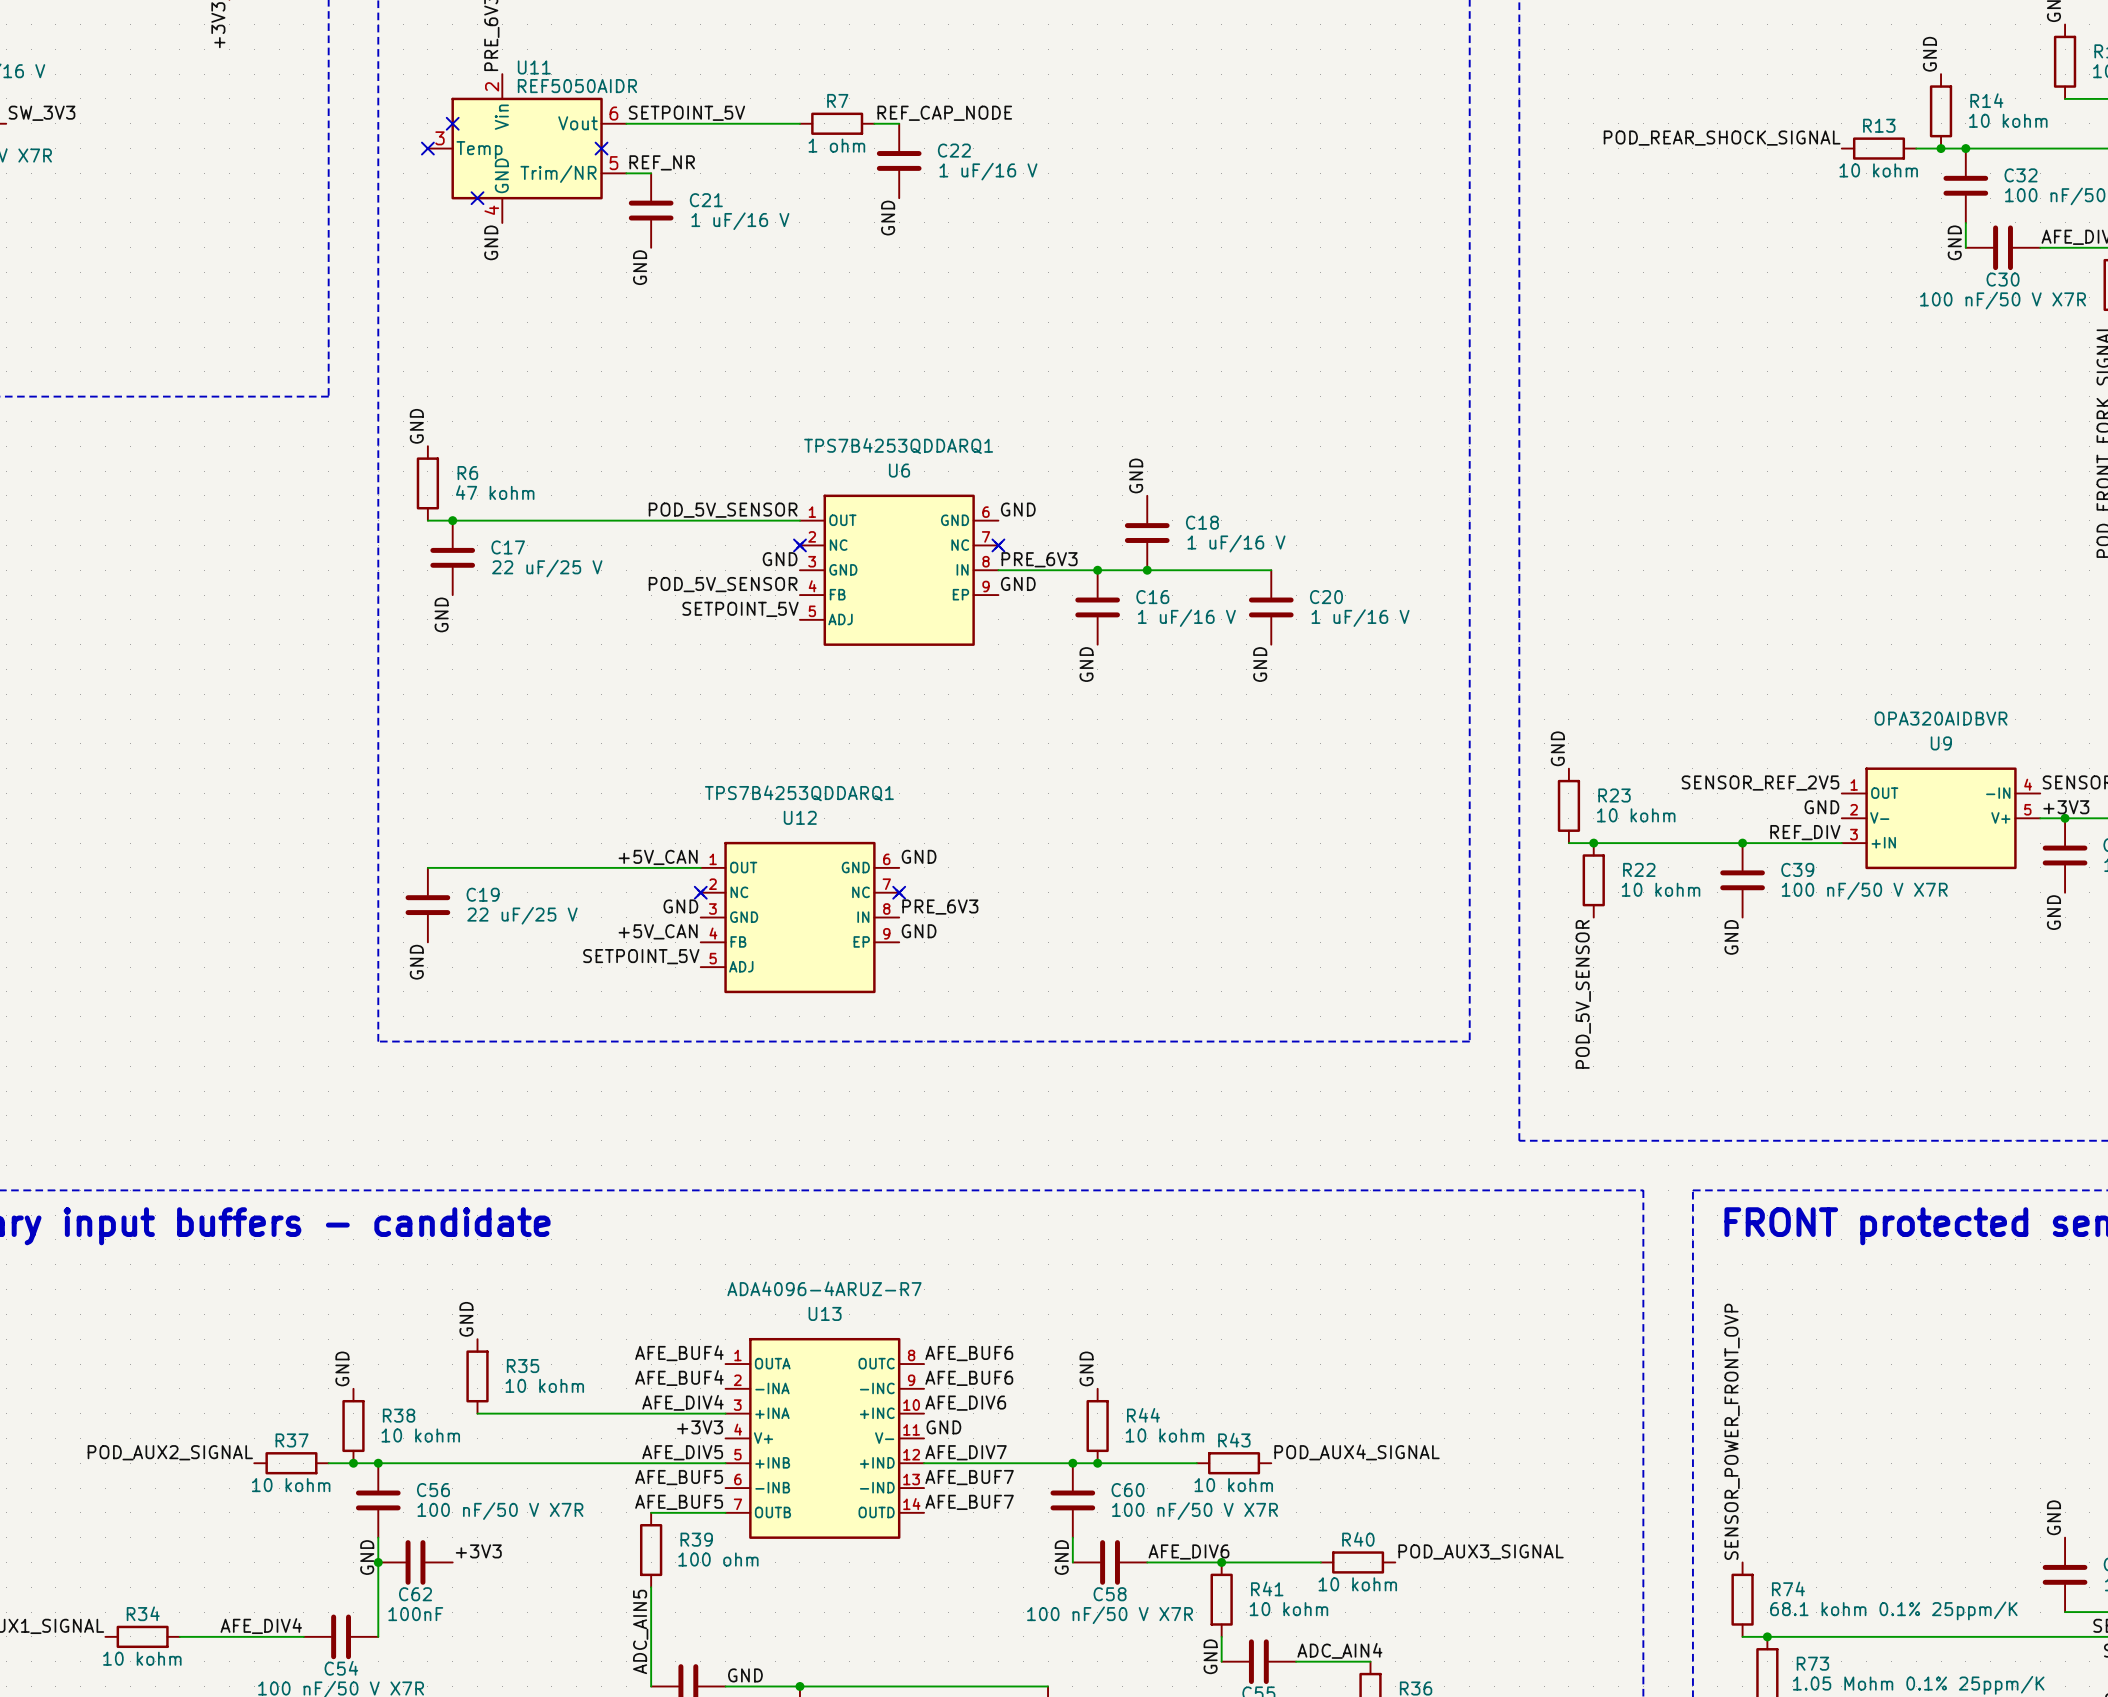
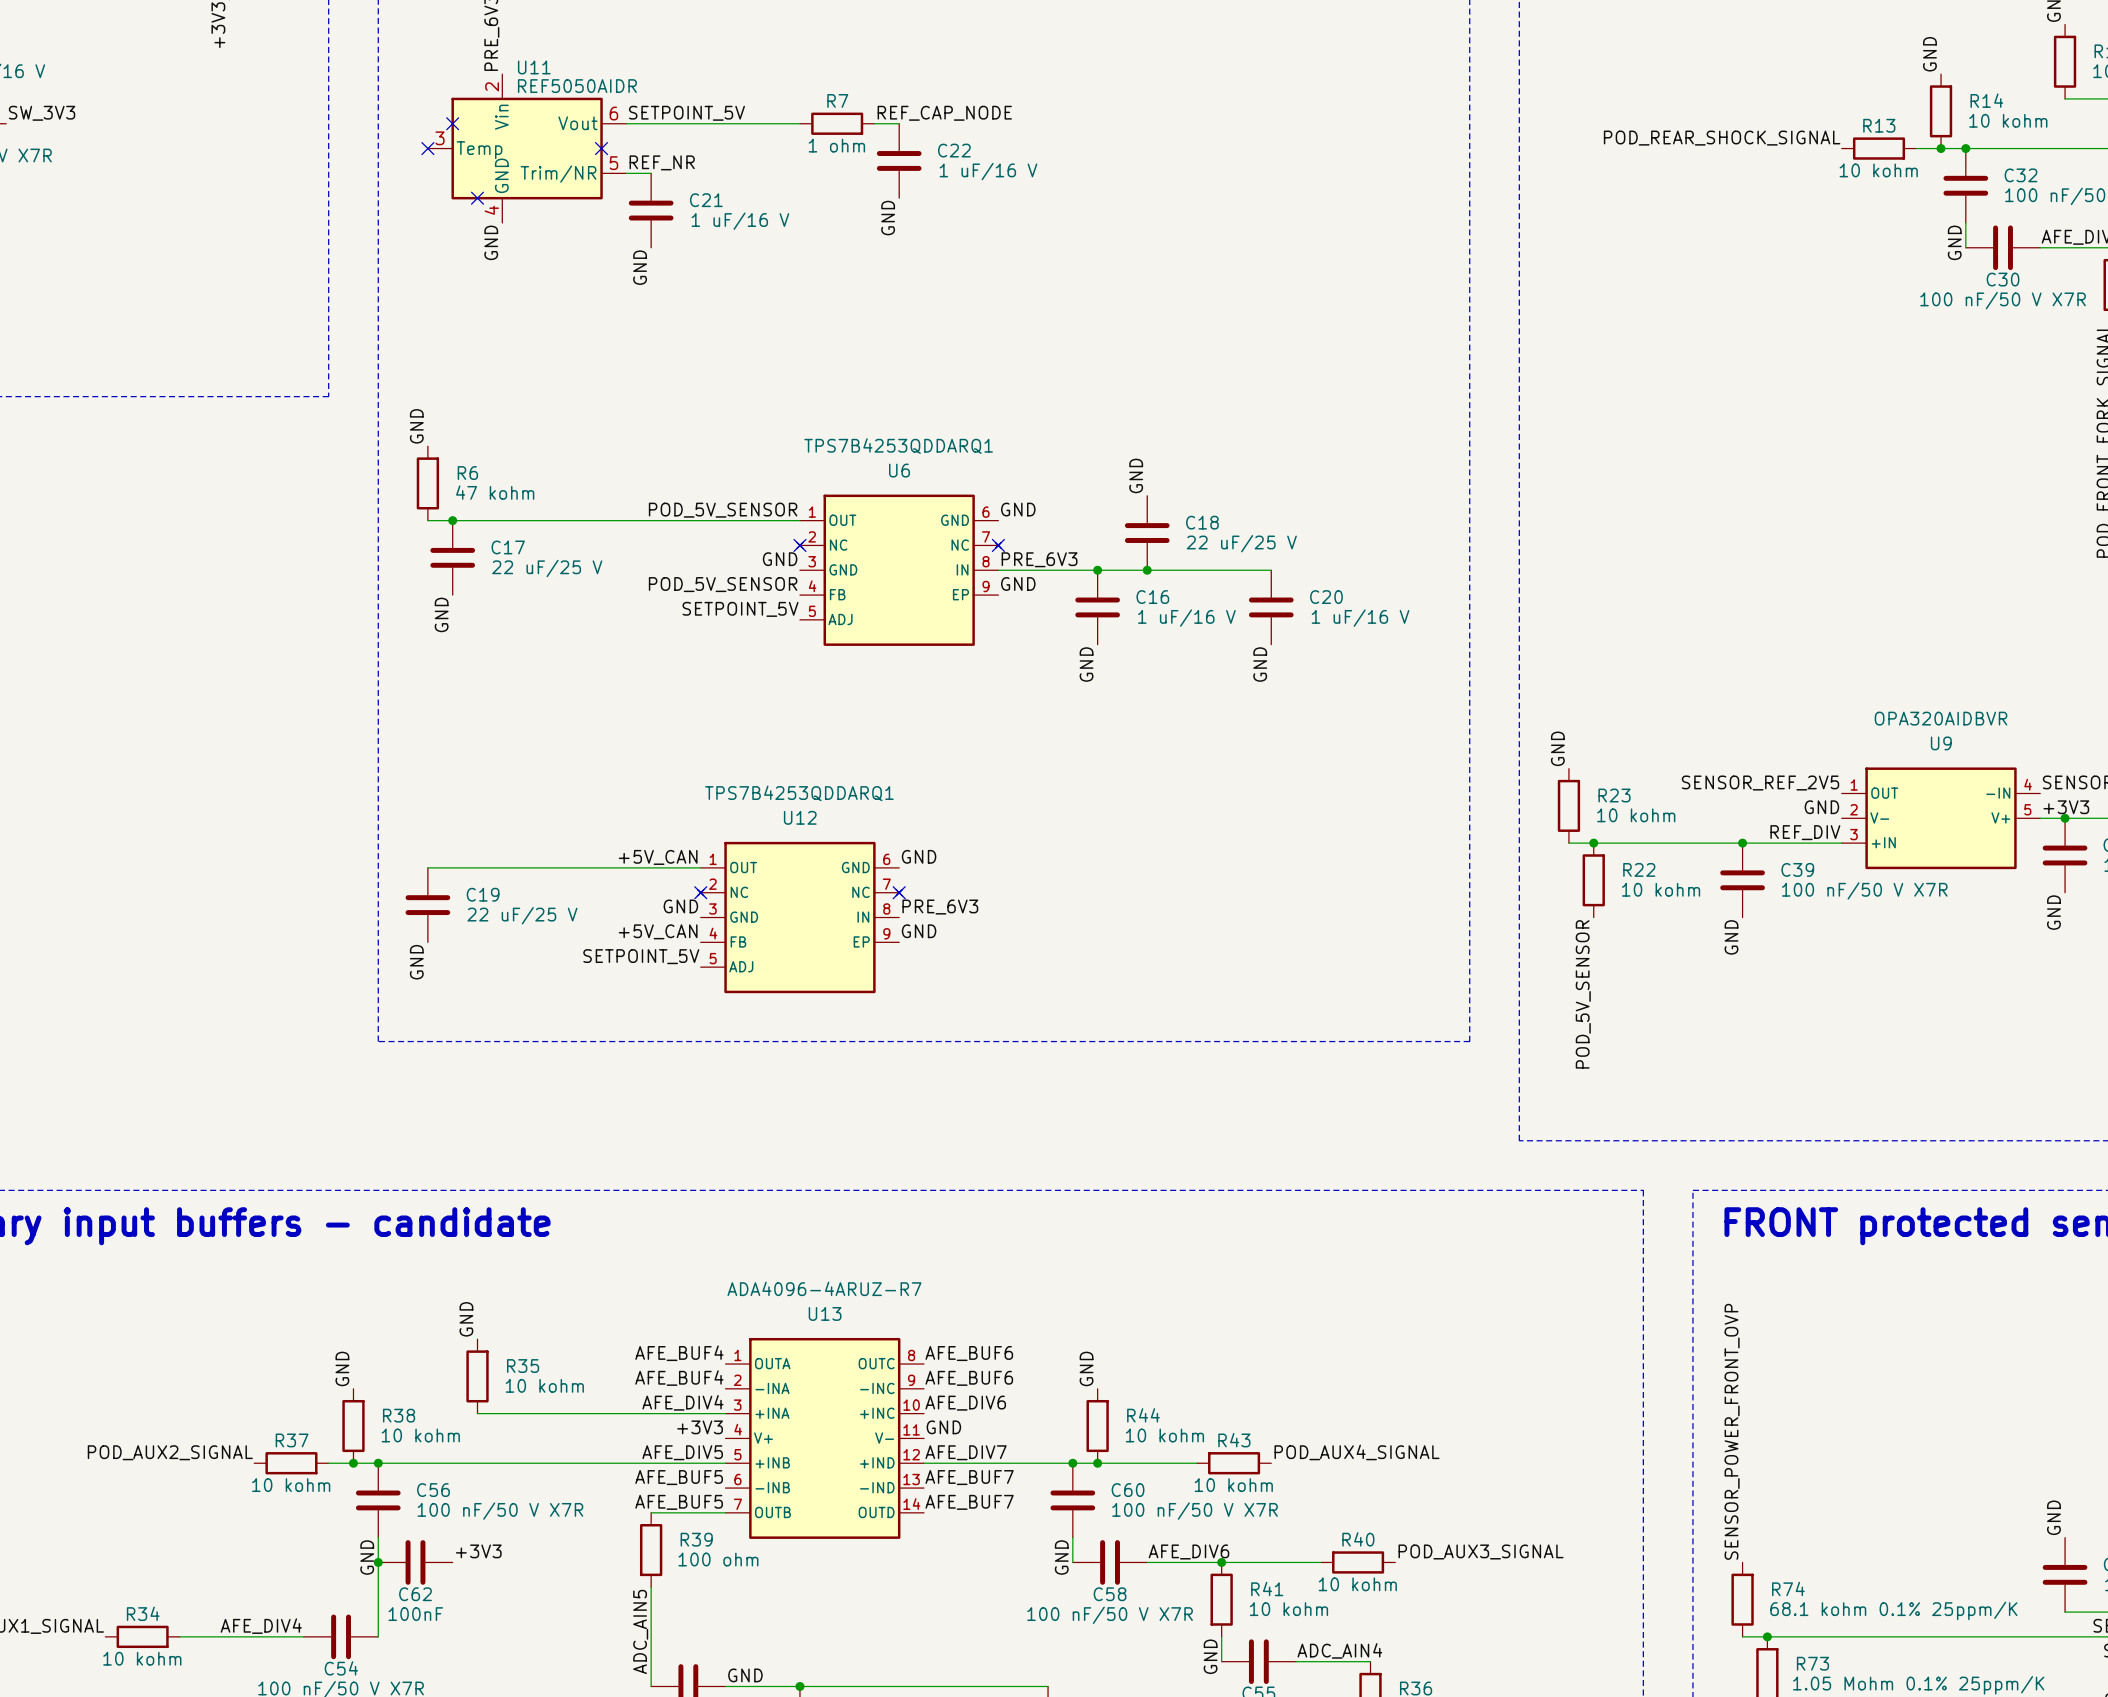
C18 value: 1 uF/16 V (1236, 543) -> 22 uF/25 V (1241, 543)

